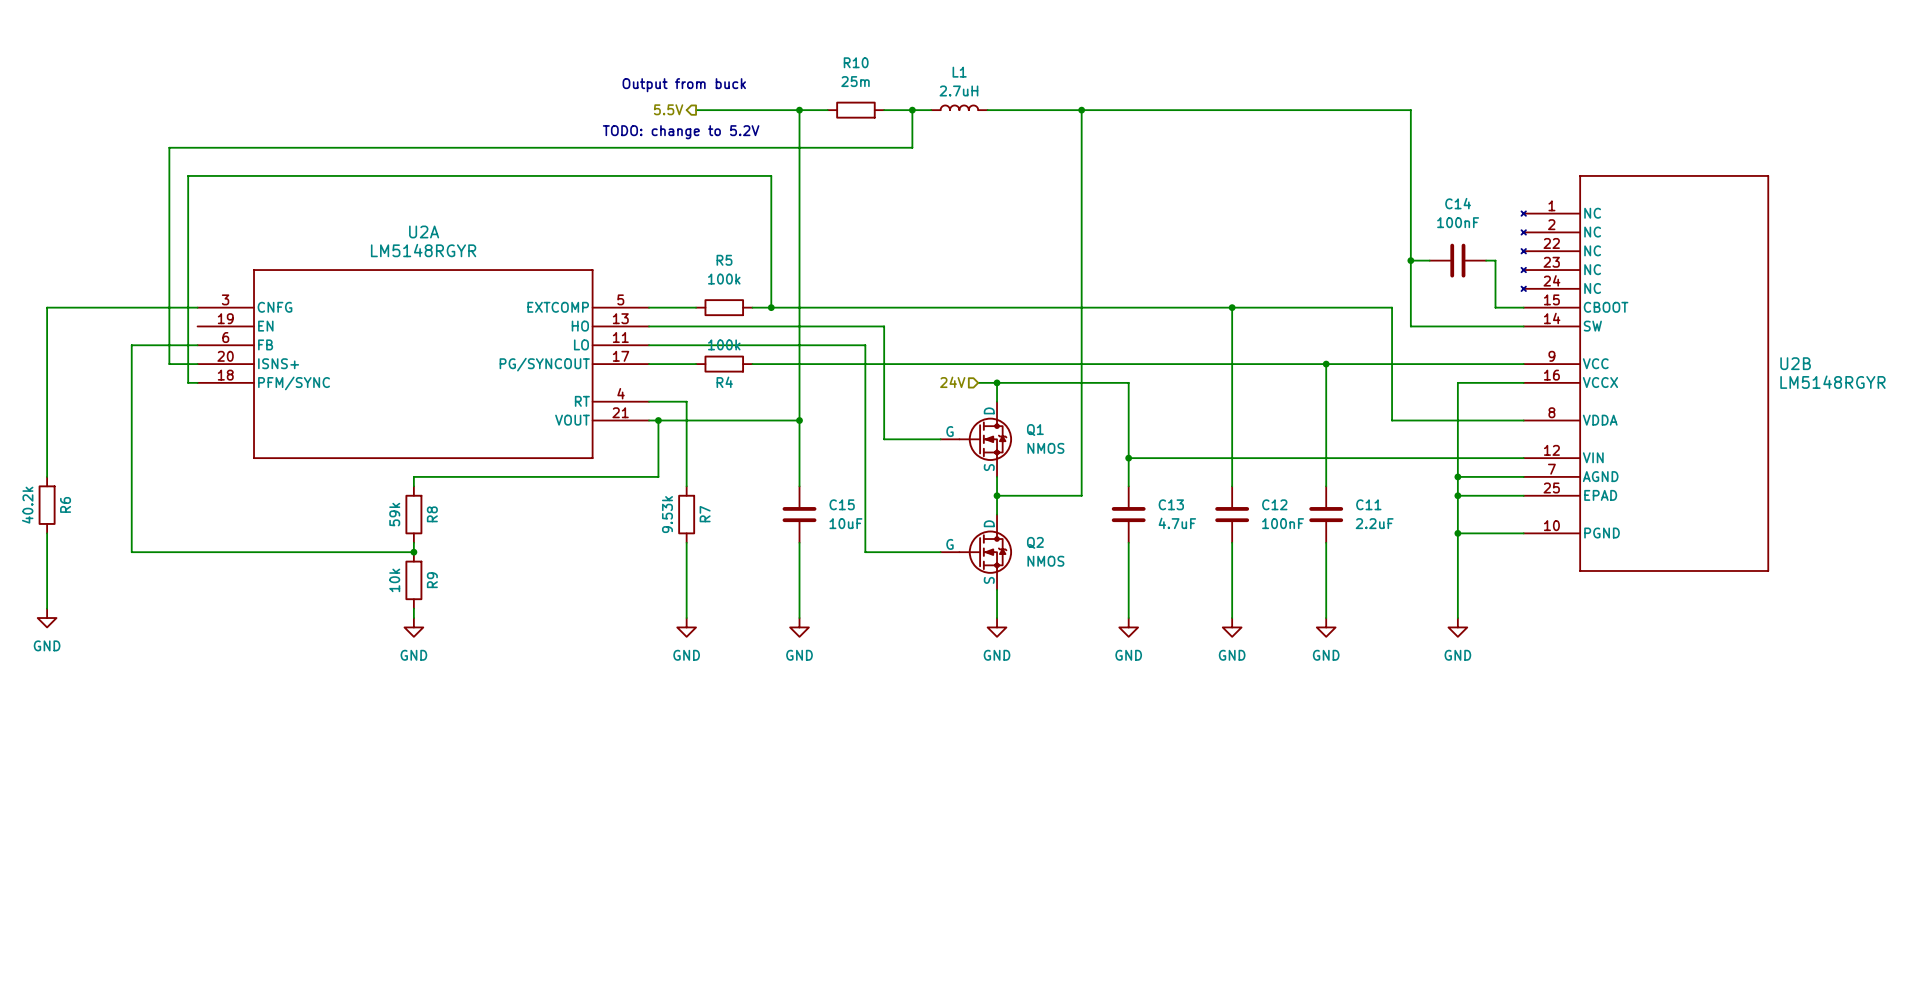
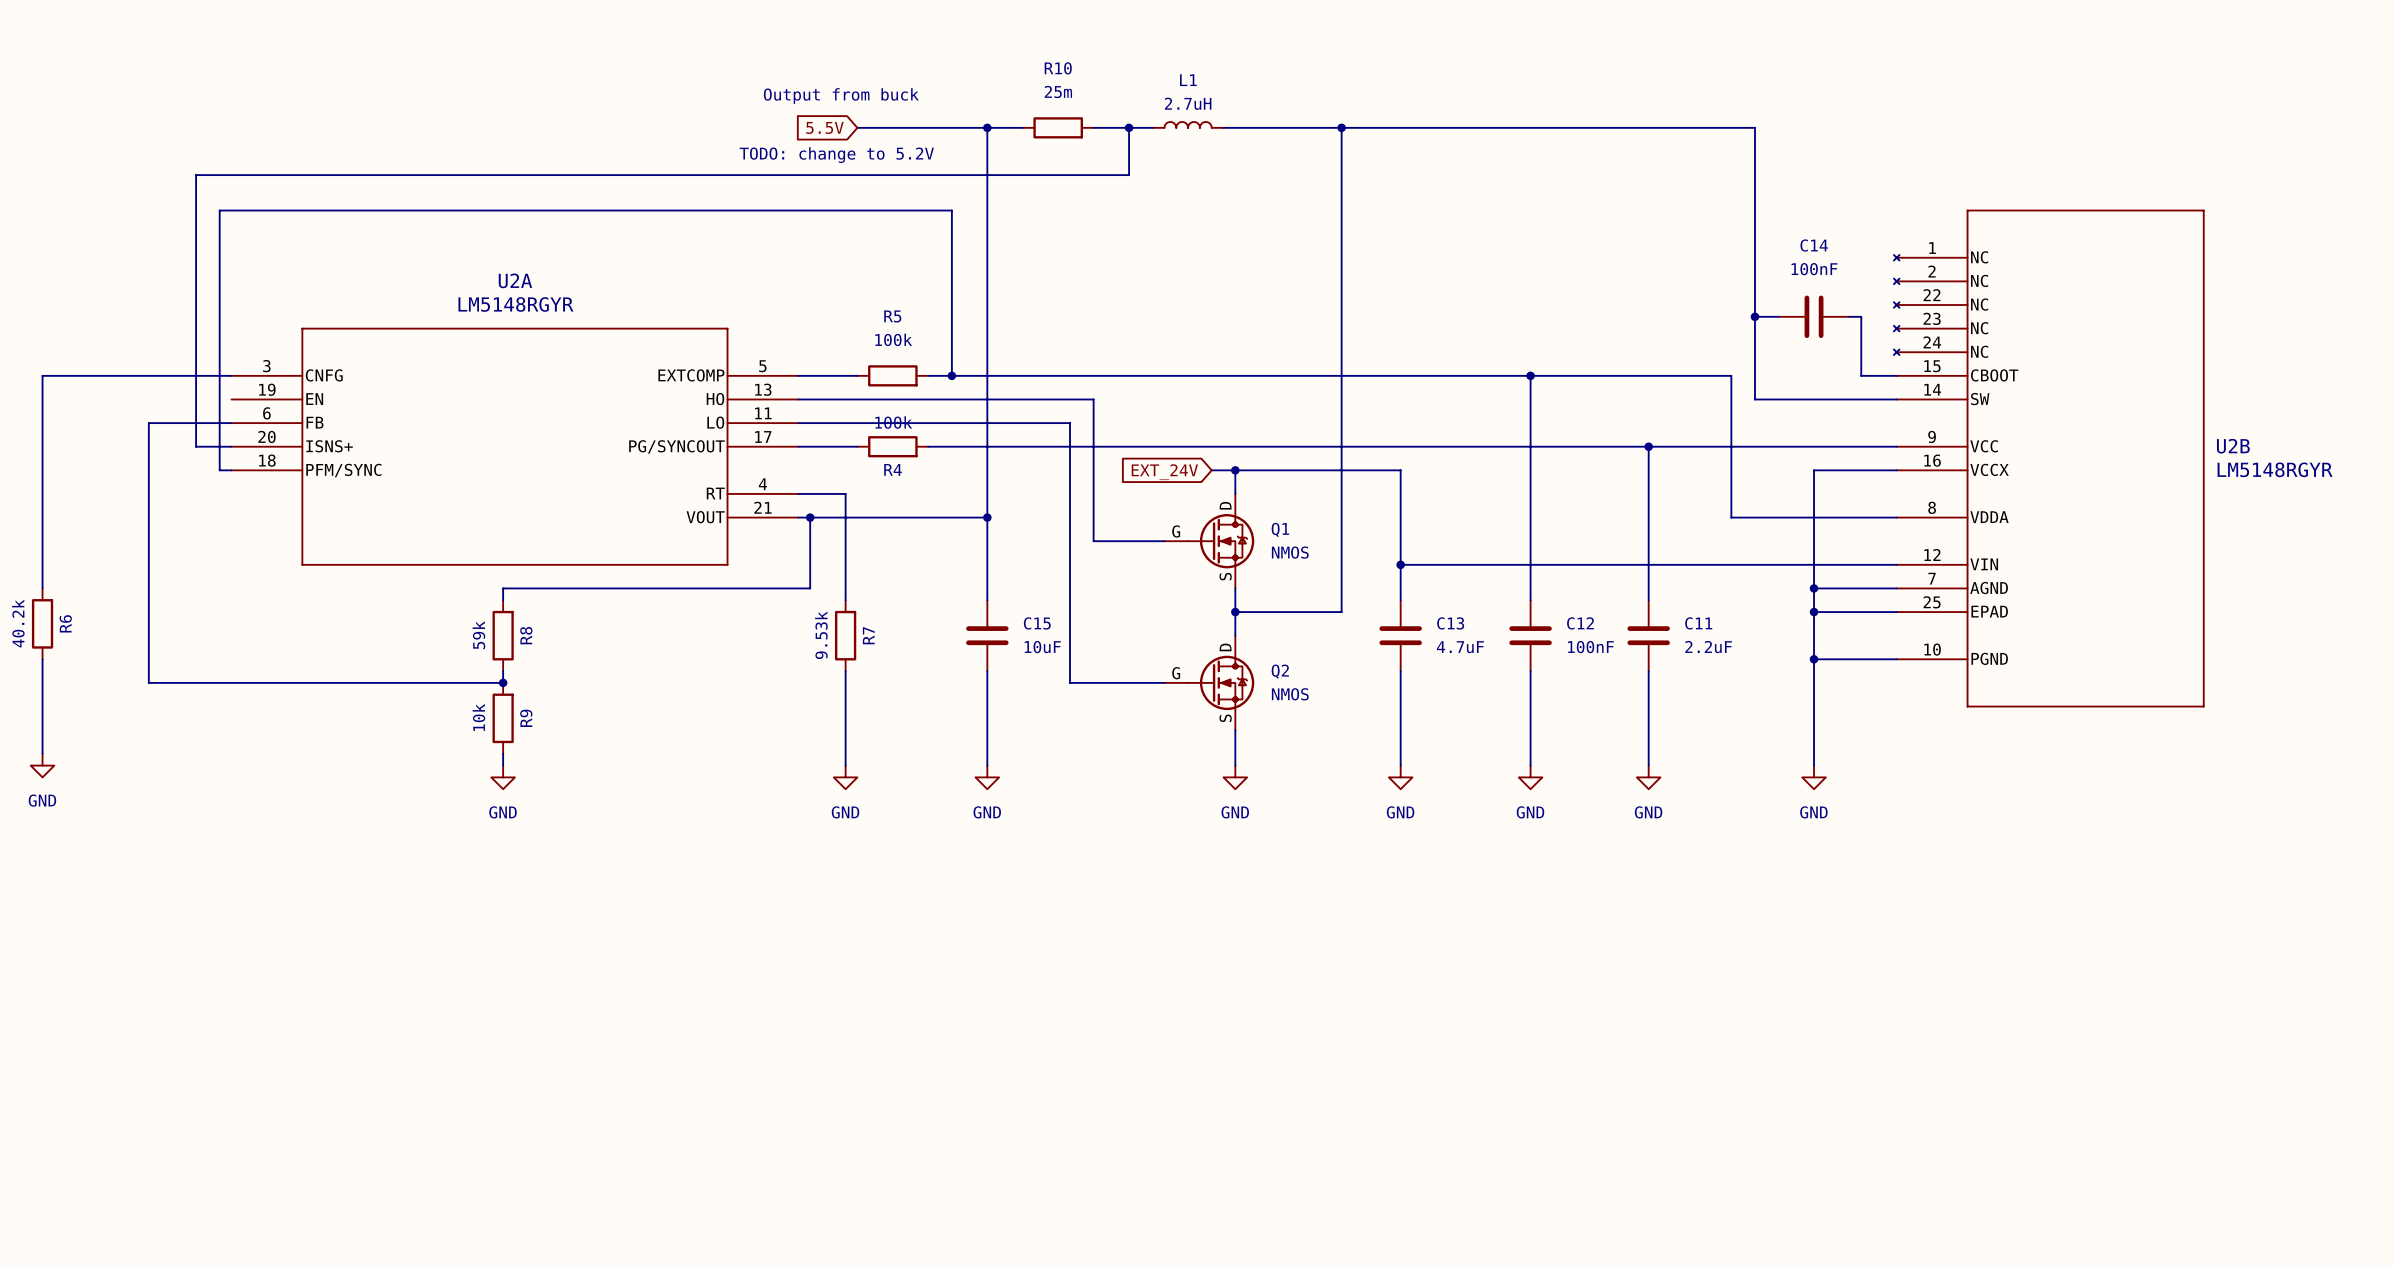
hierarchical label: 5.5V (668, 109) -> none
global label: none -> 5.5V (824, 127)
hierarchical label: 24V (952, 382) -> none
global label: none -> EXT_24V (1164, 472)

